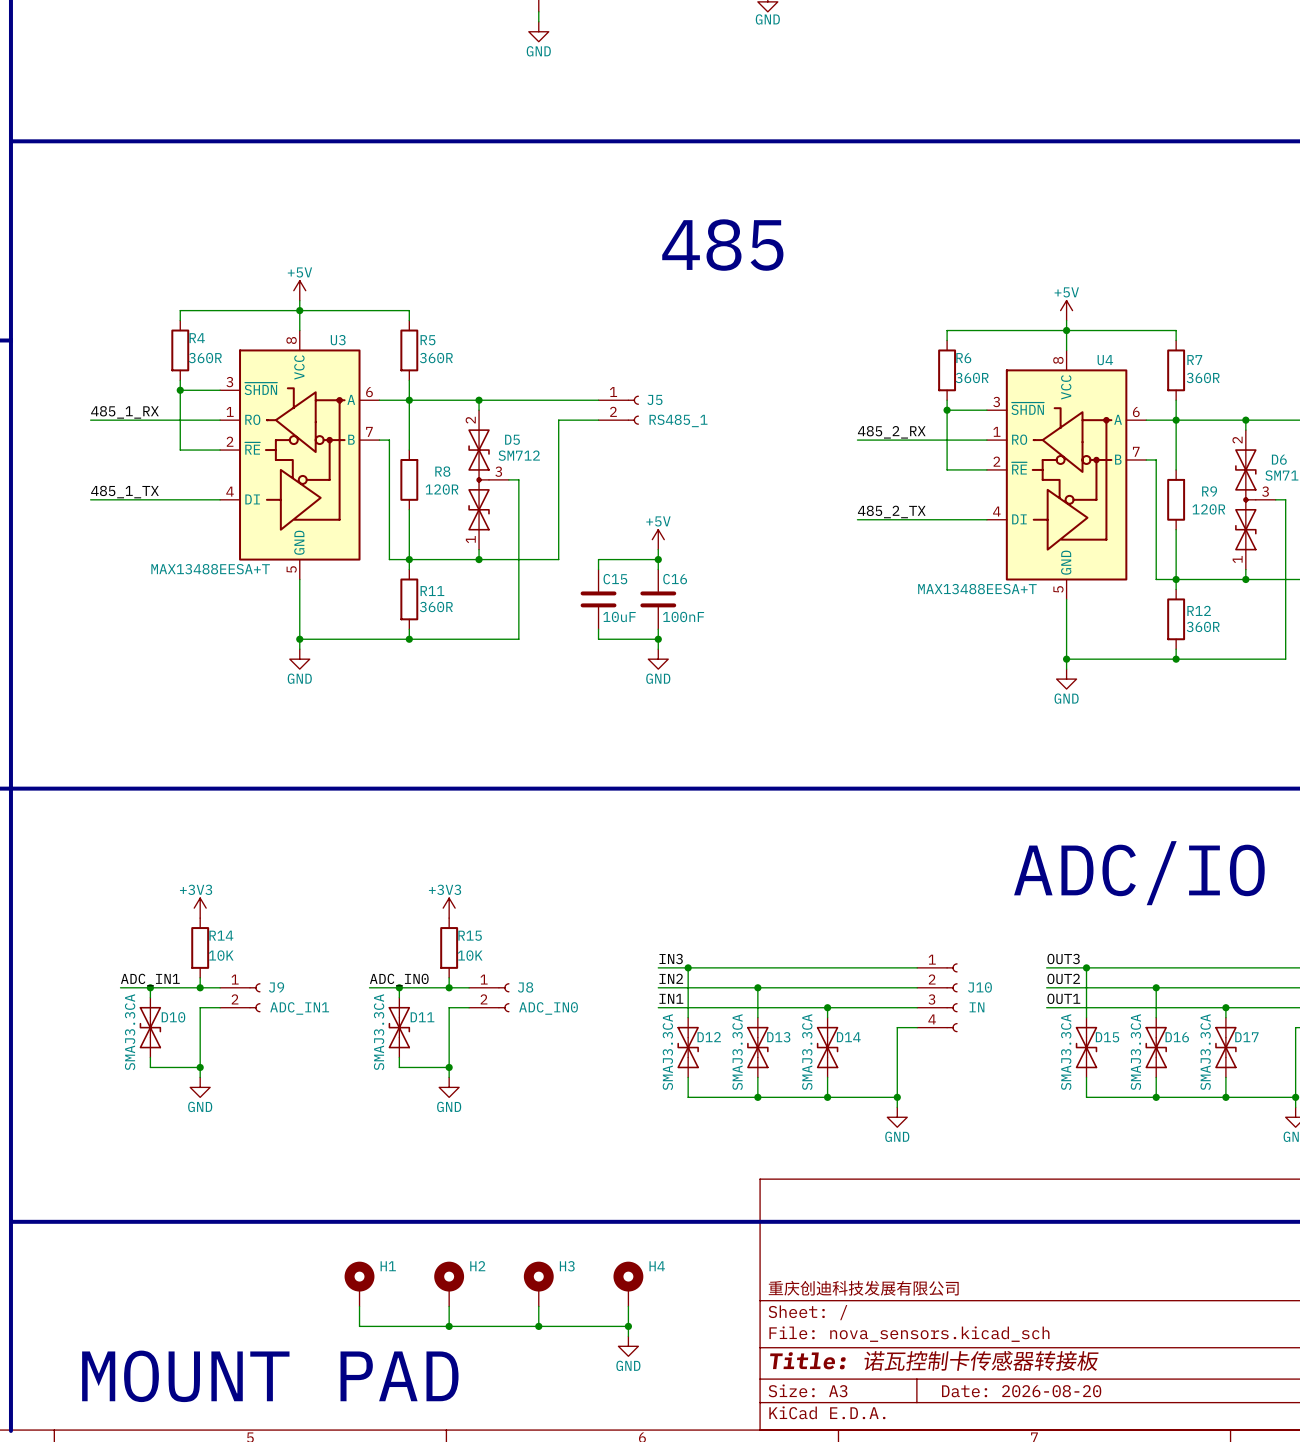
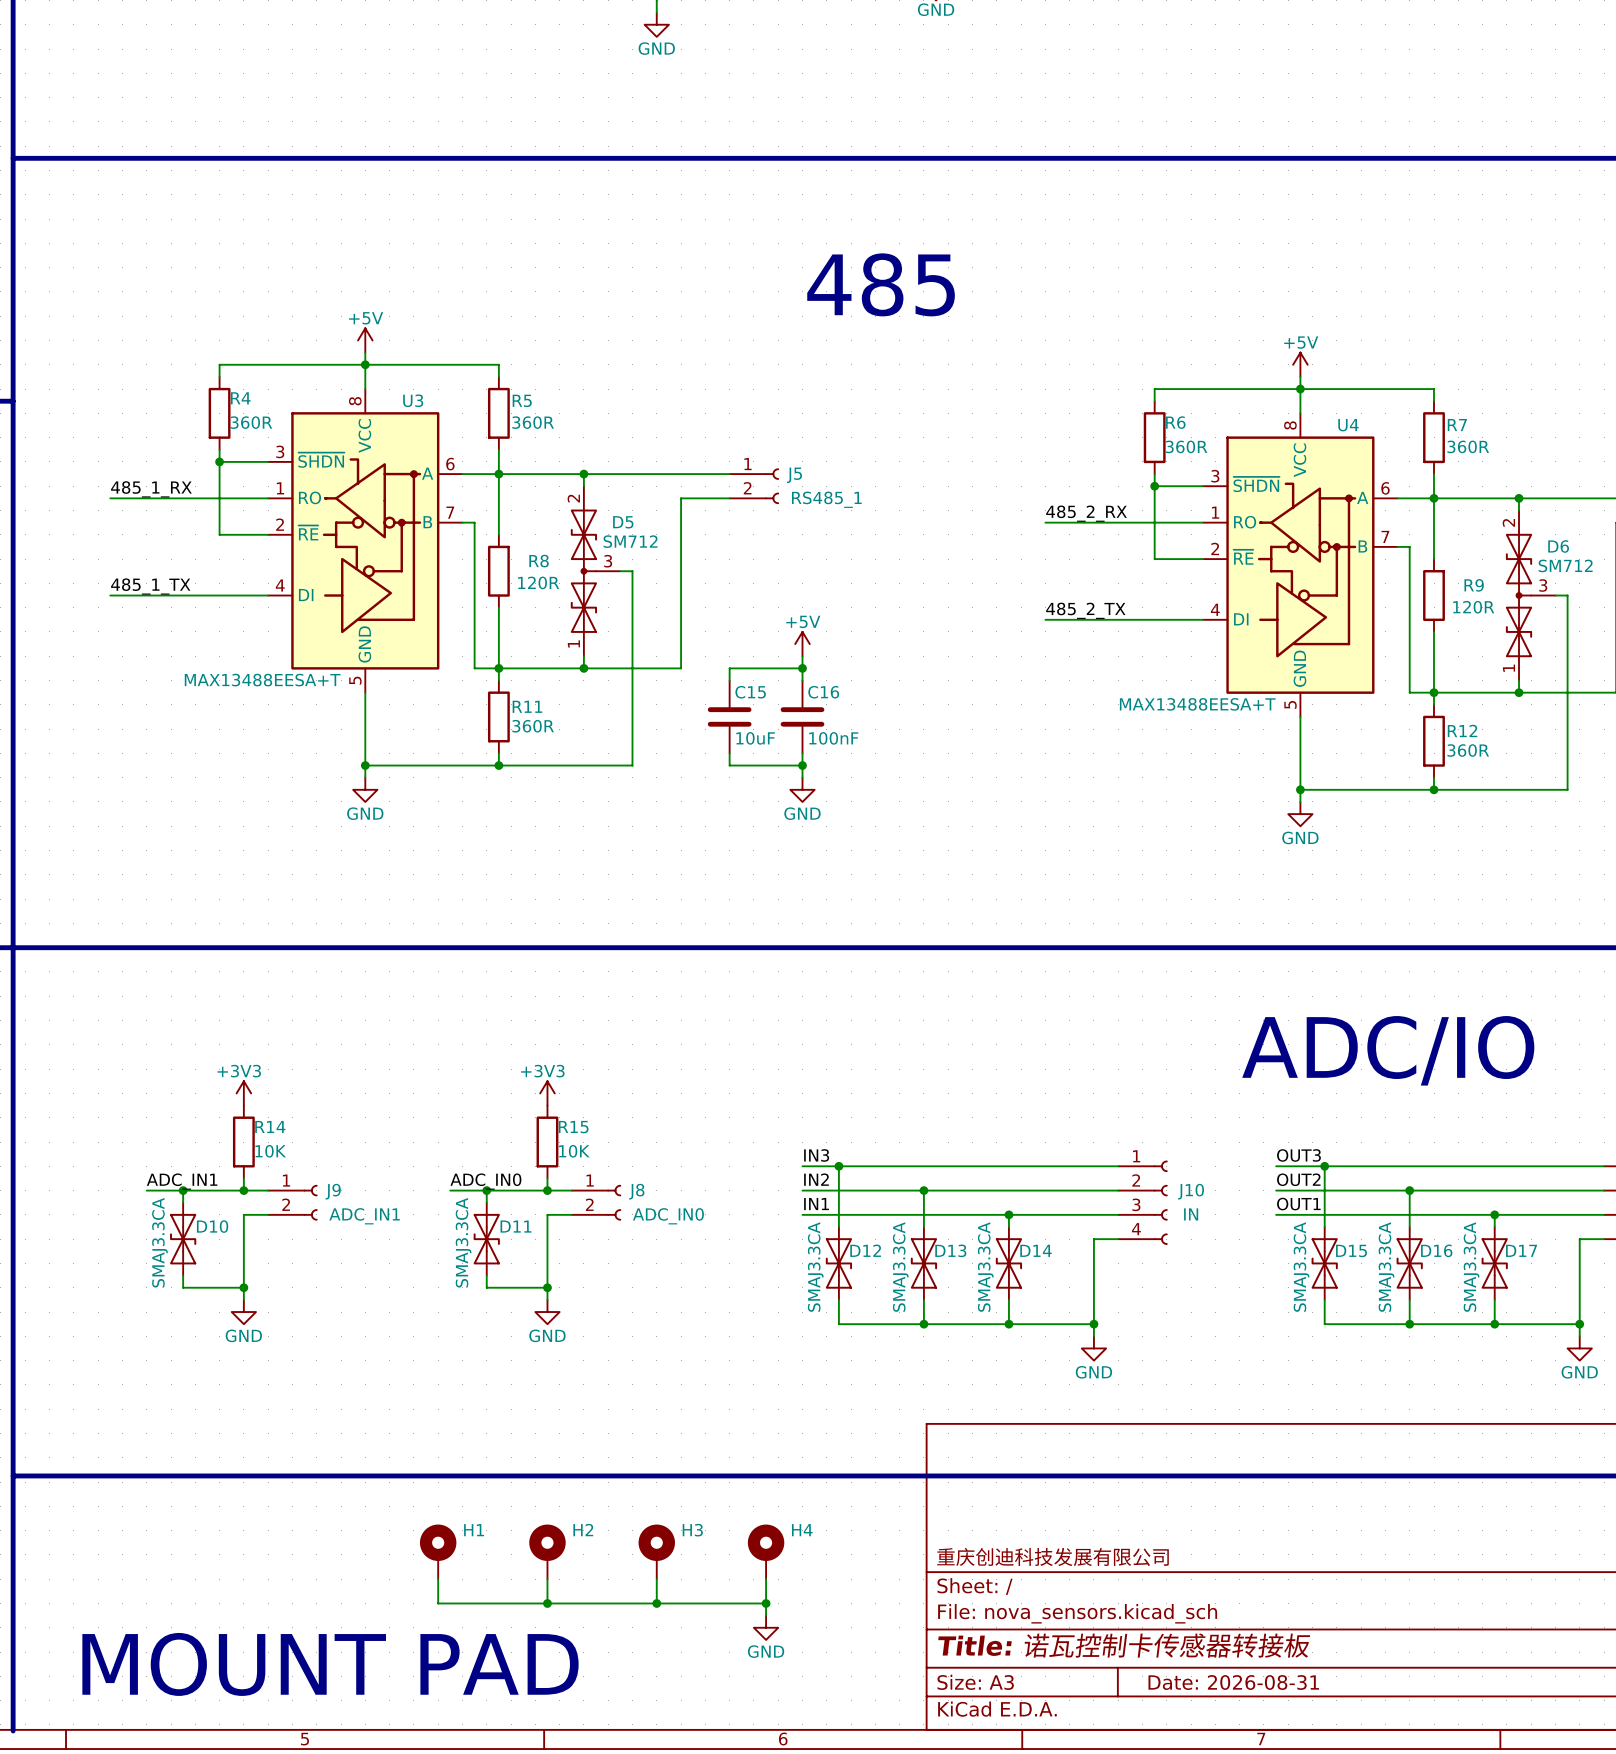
title block: Date: 2026-08-20 (1021, 1391) -> Date: 2026-08-31 (1233, 1682)

